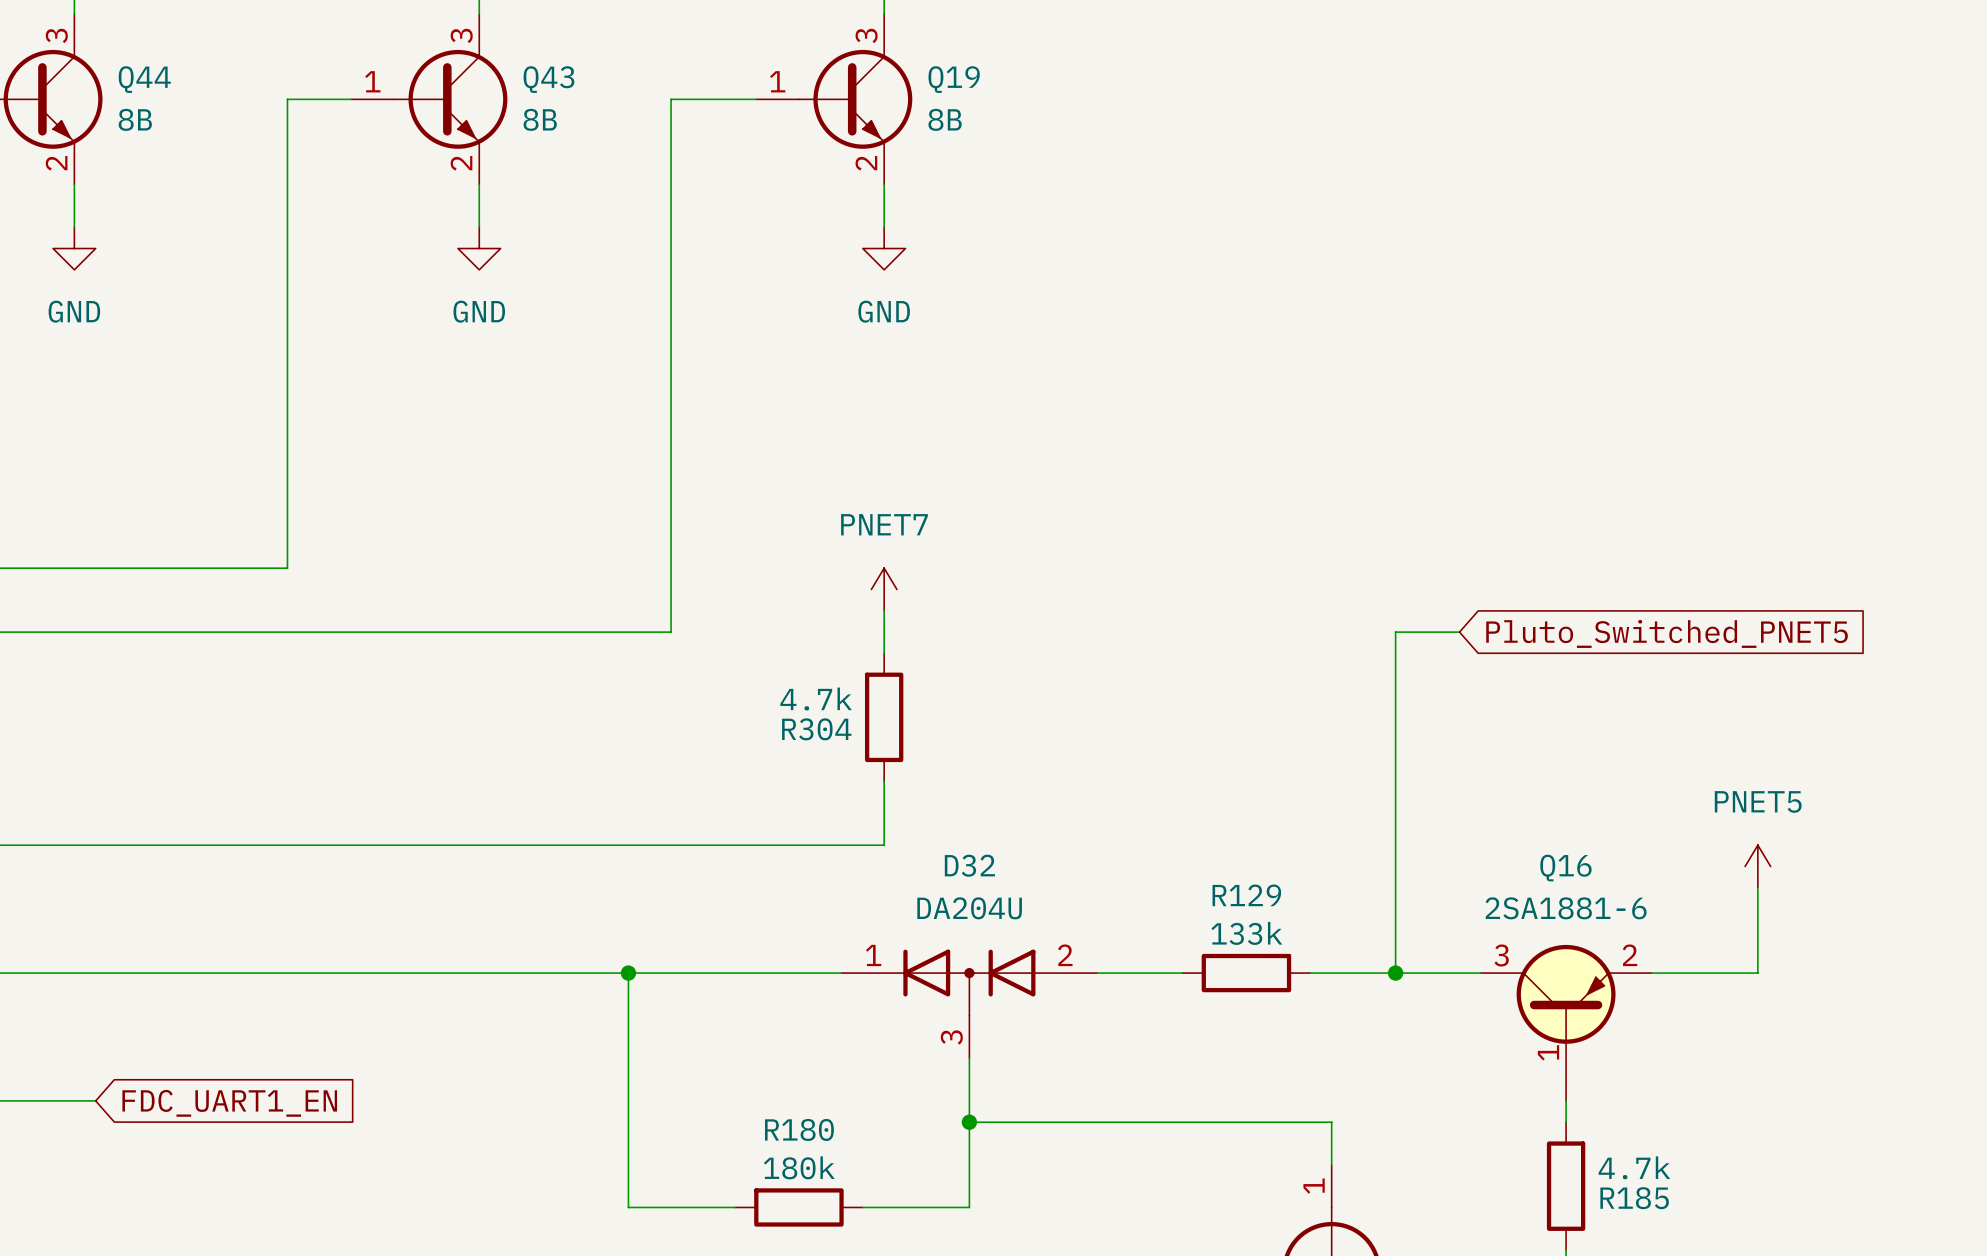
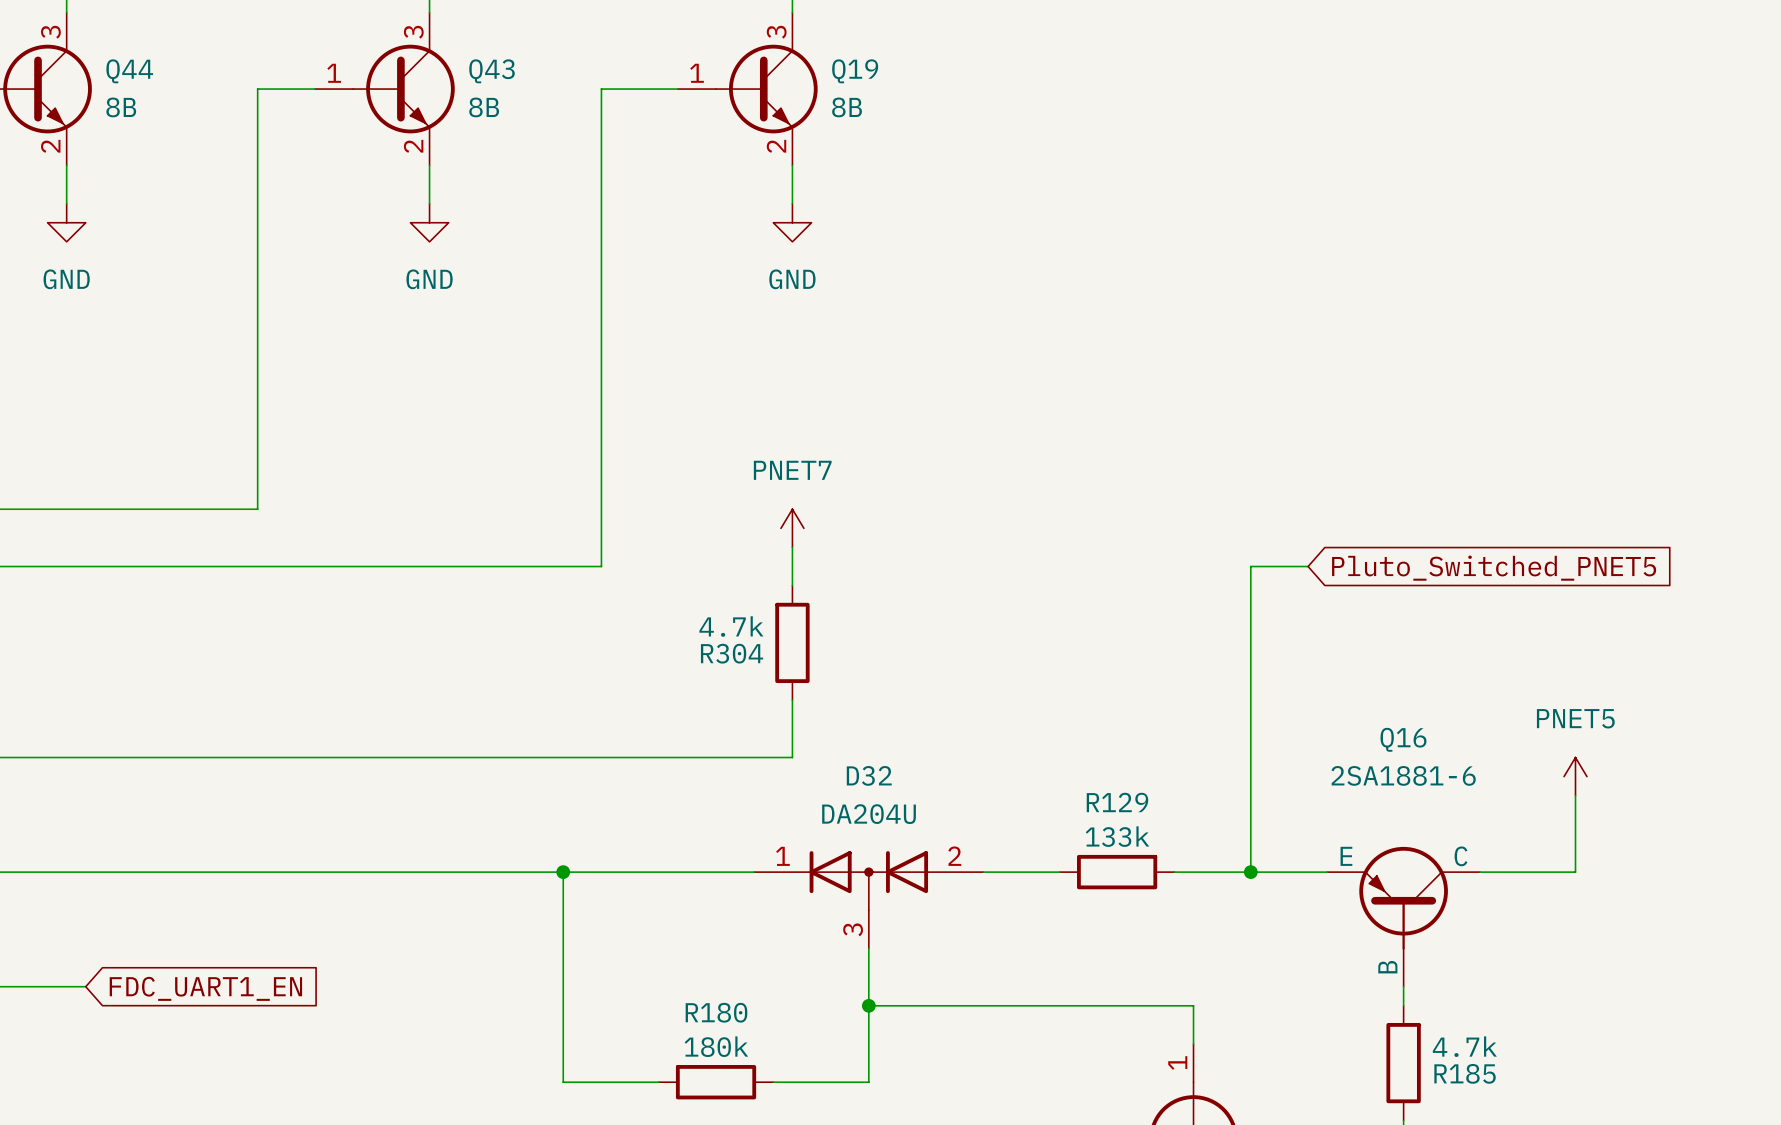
Q16 name position: Q16 (1565, 868) -> Q16 (1403, 739)
Q16 value position: 2SA1881-6 (1566, 908) -> 2SA1881-6 (1403, 775)
Q16 symbol: [1480, 944, 1652, 1101] -> [1327, 846, 1481, 987]

